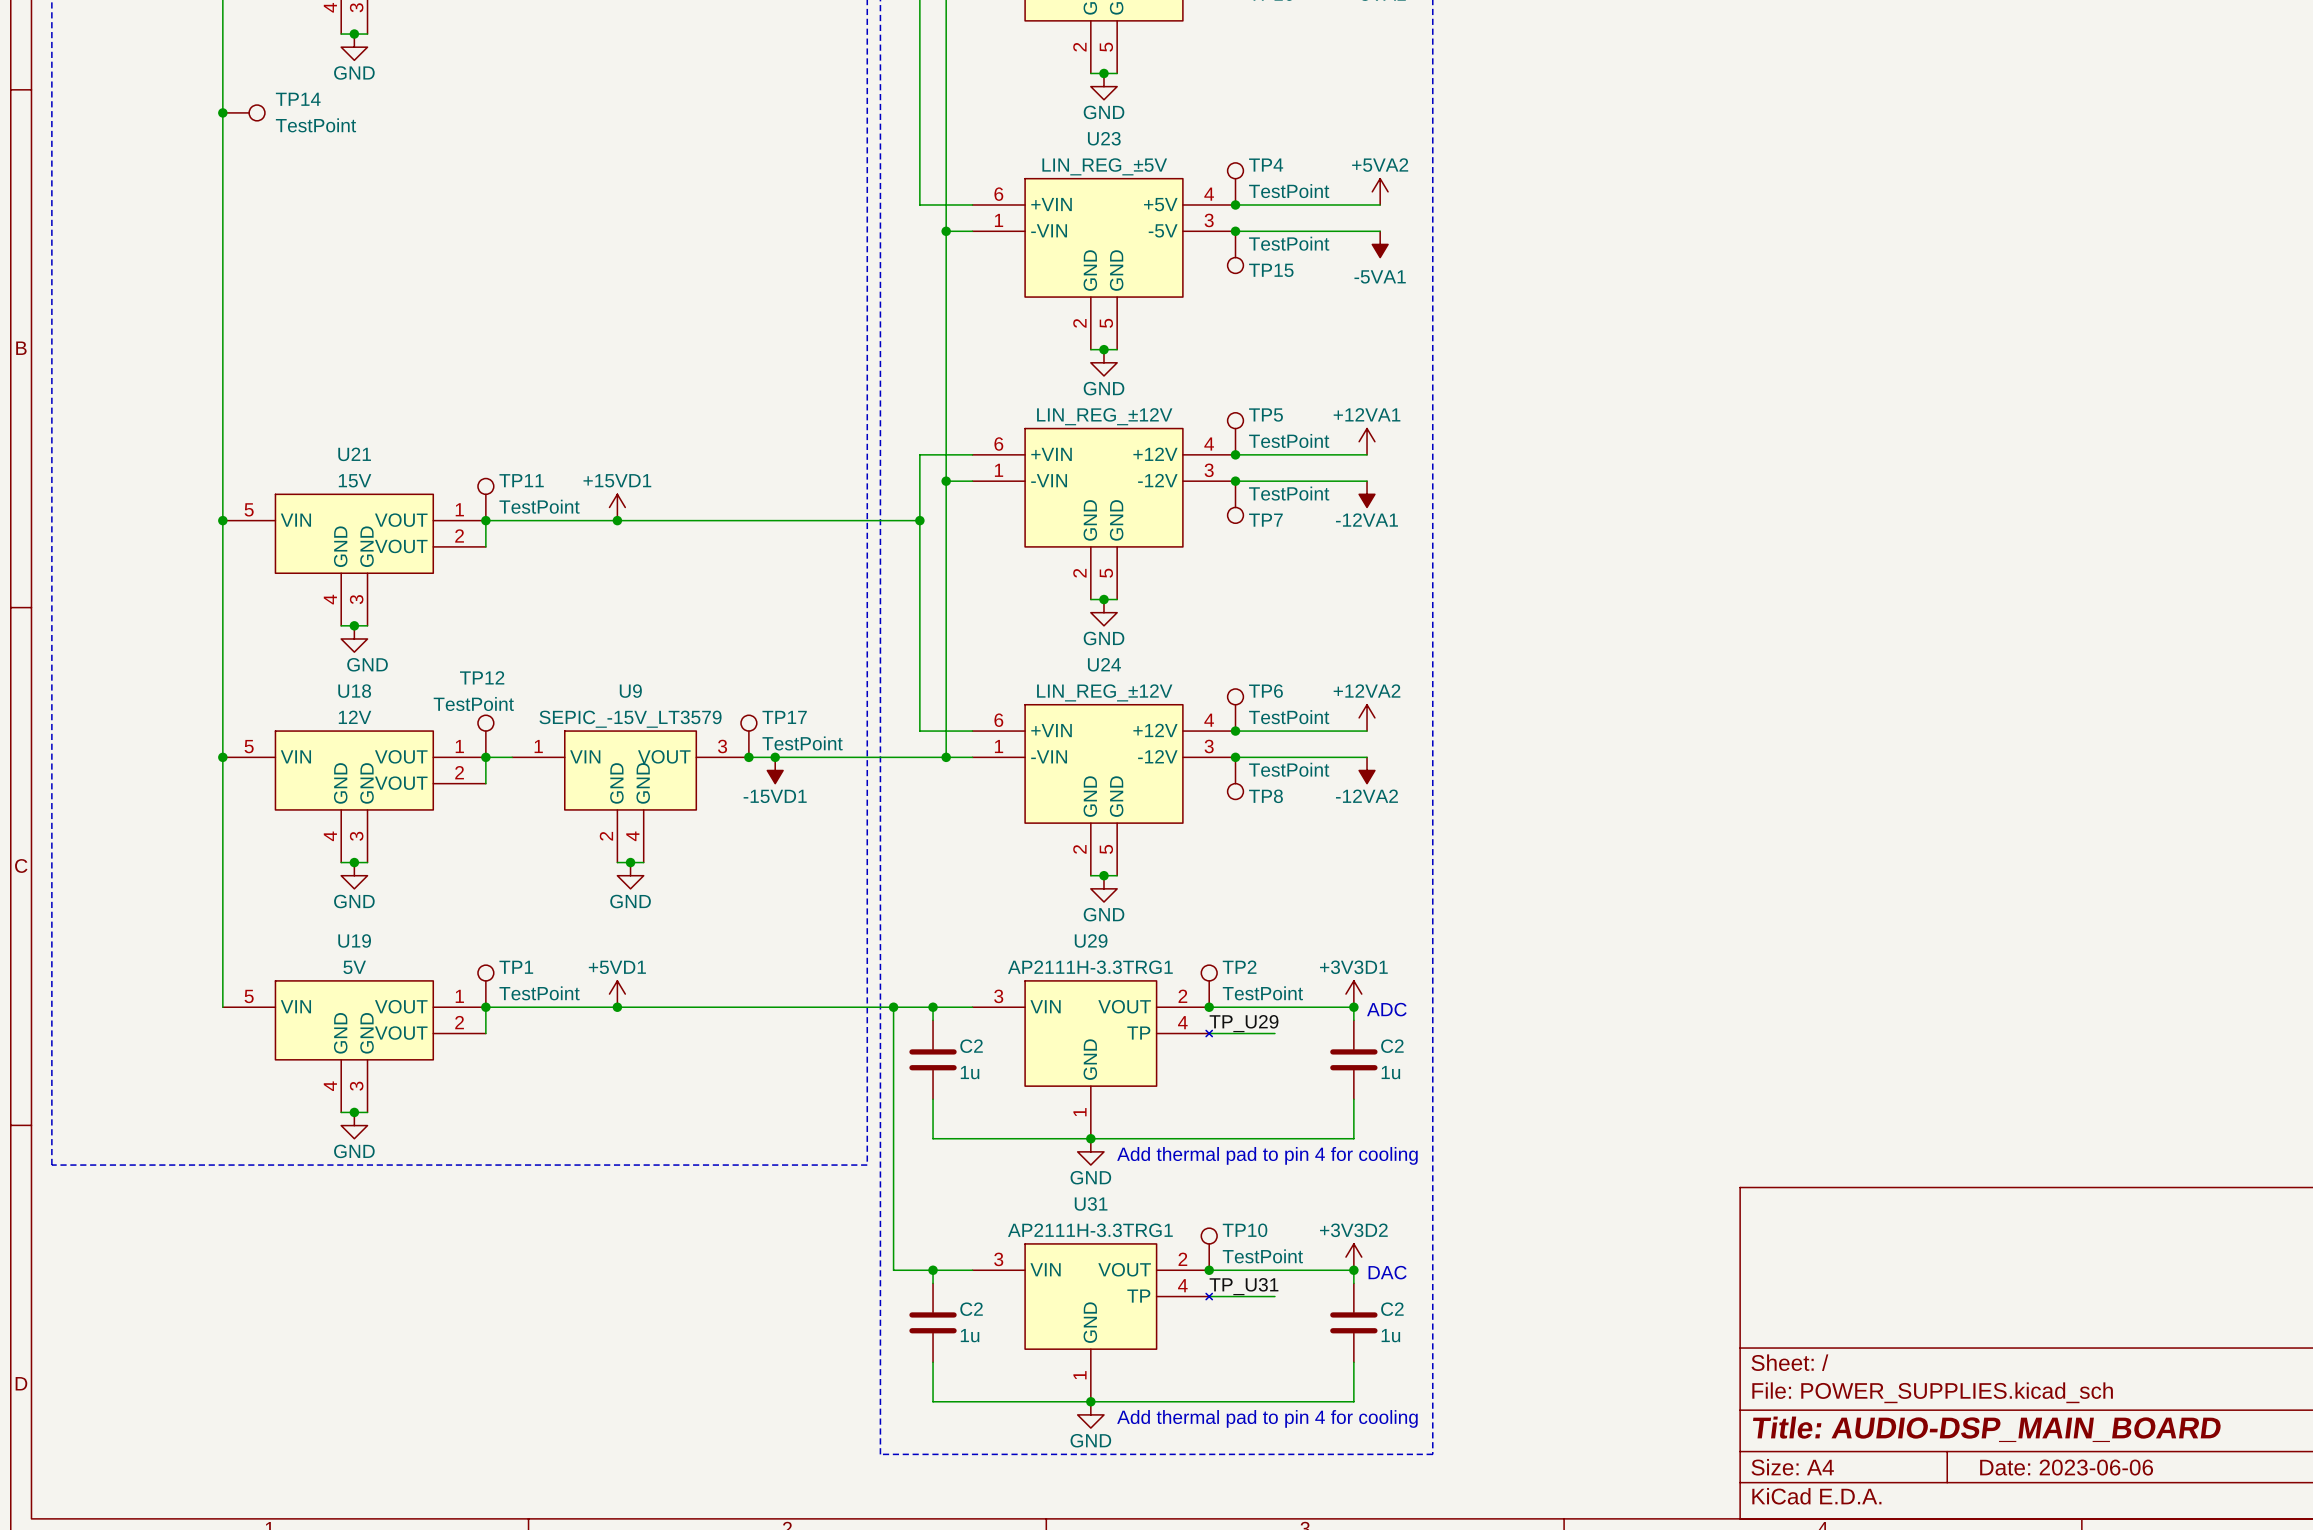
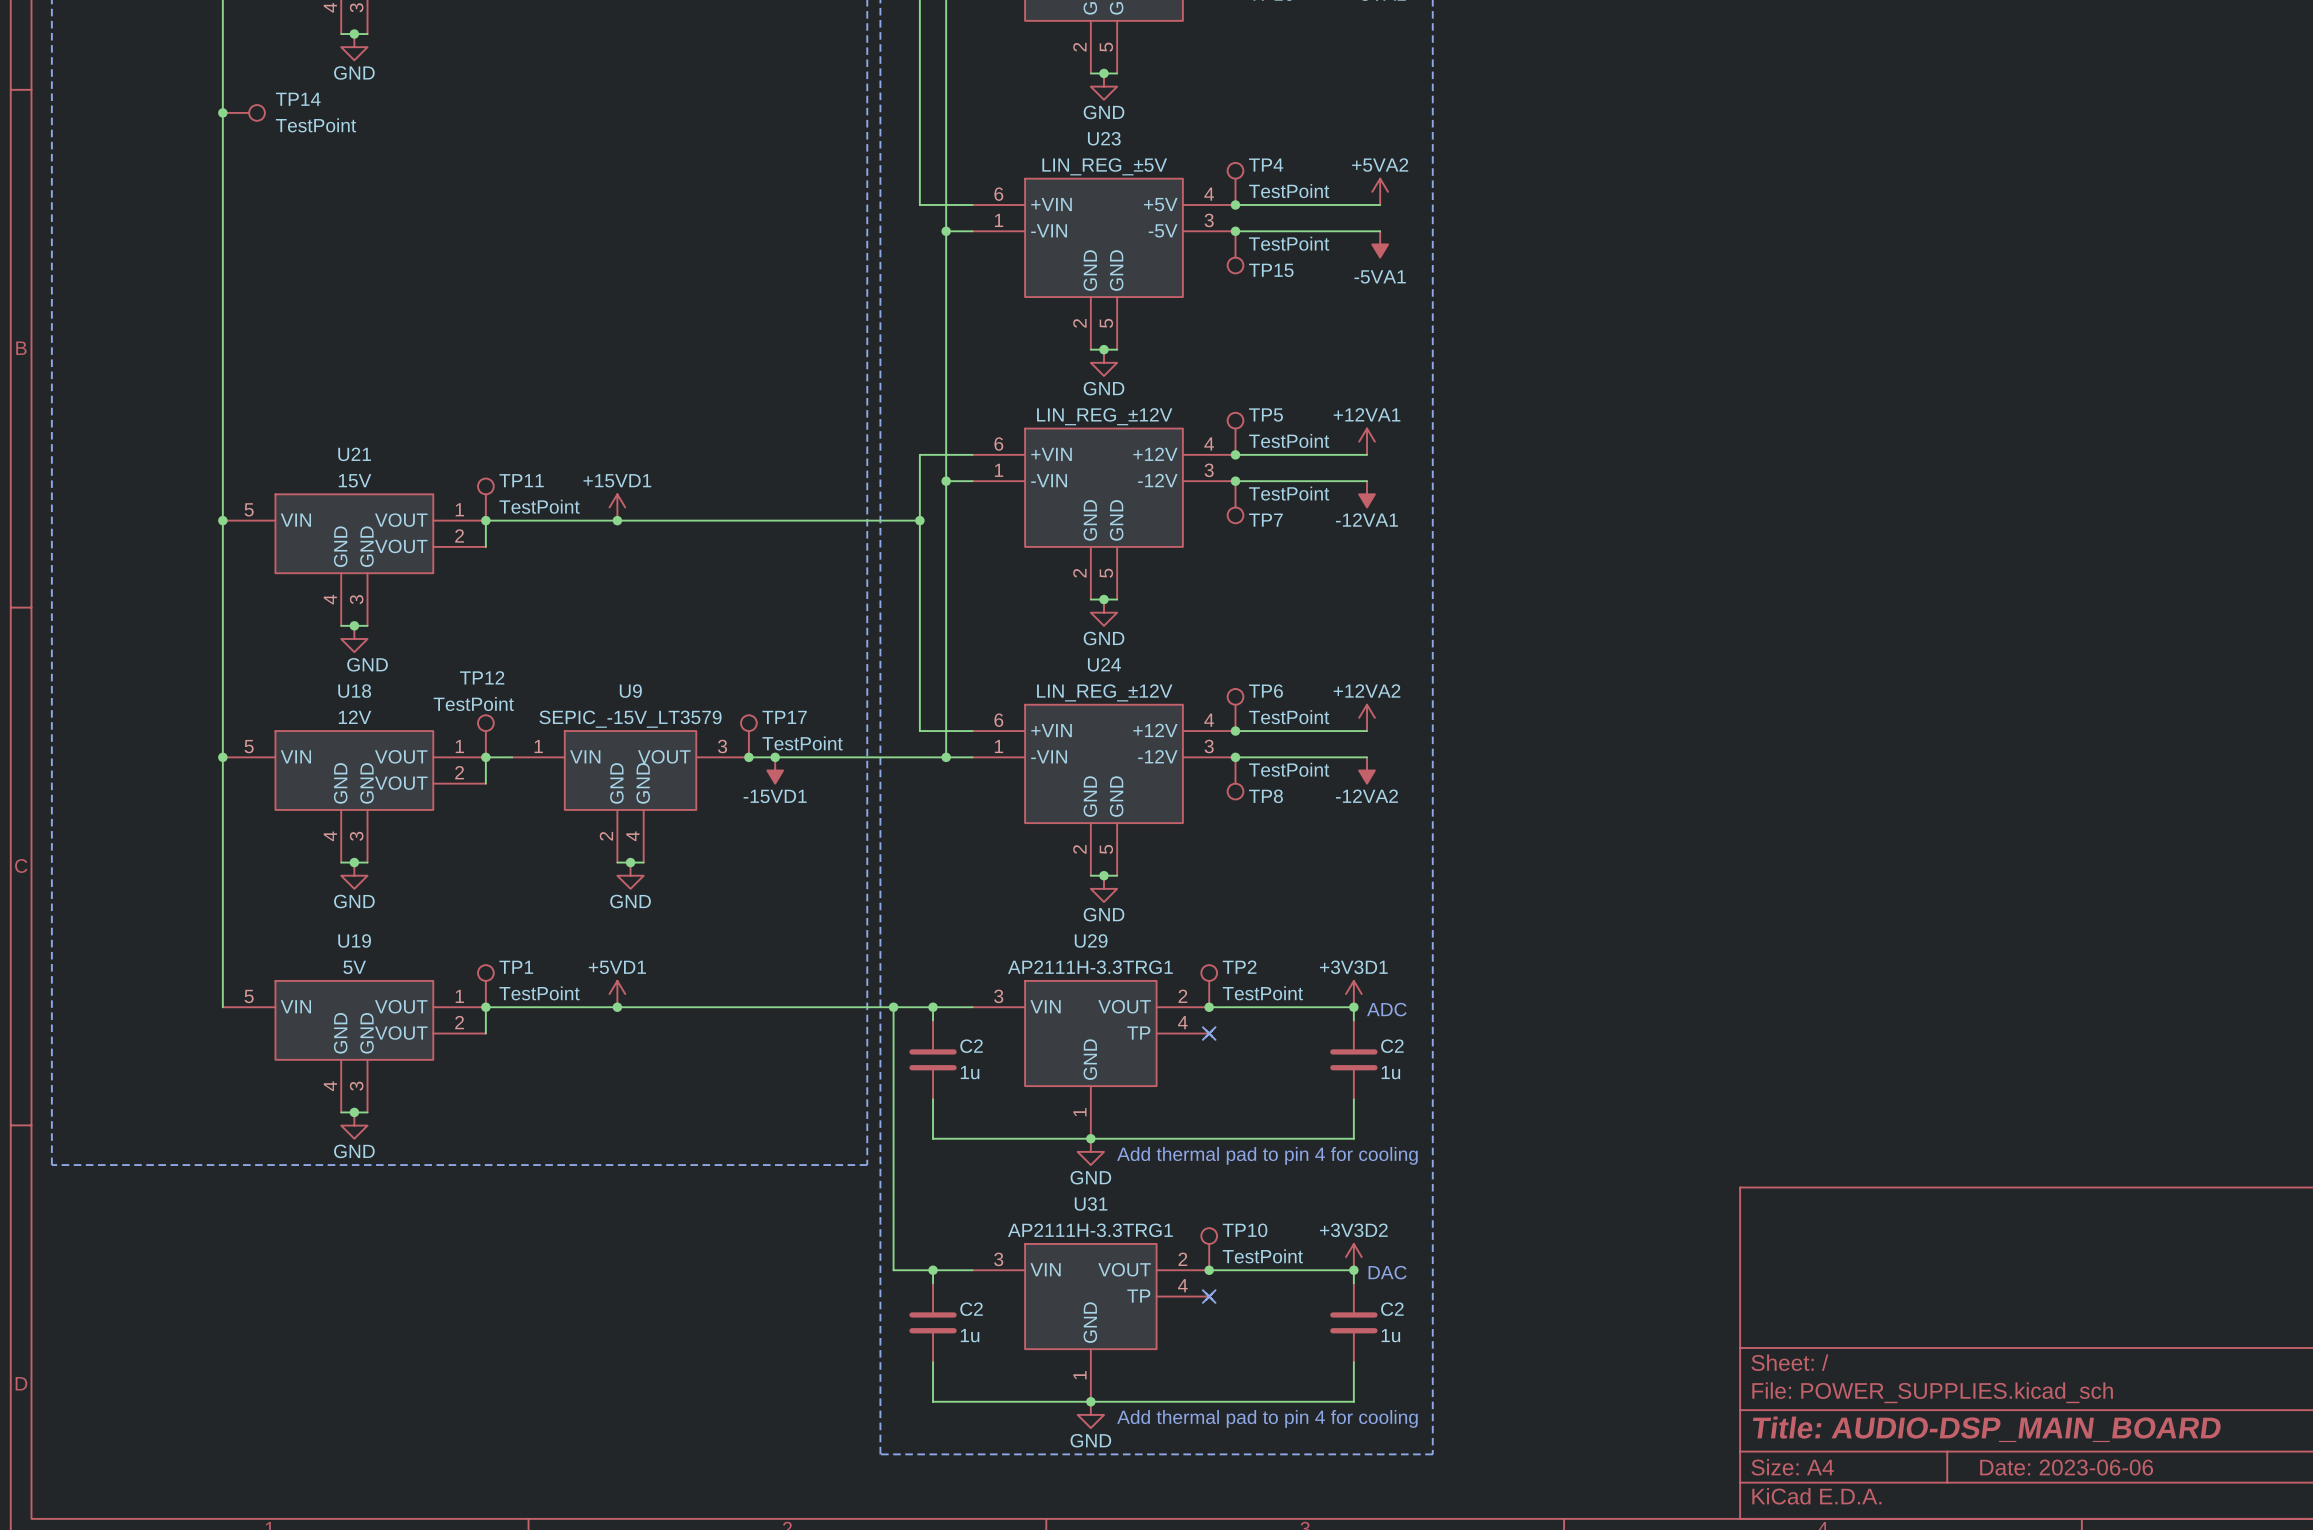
label: TP_U29 (1244, 1023) -> none
wire: (1209, 1033) (1274, 1033) -> none
no-connect mark: none -> (1209, 1033)
label: TP_U31 (1244, 1286) -> none
wire: (1209, 1296) (1274, 1296) -> none
no-connect mark: none -> (1209, 1296)

